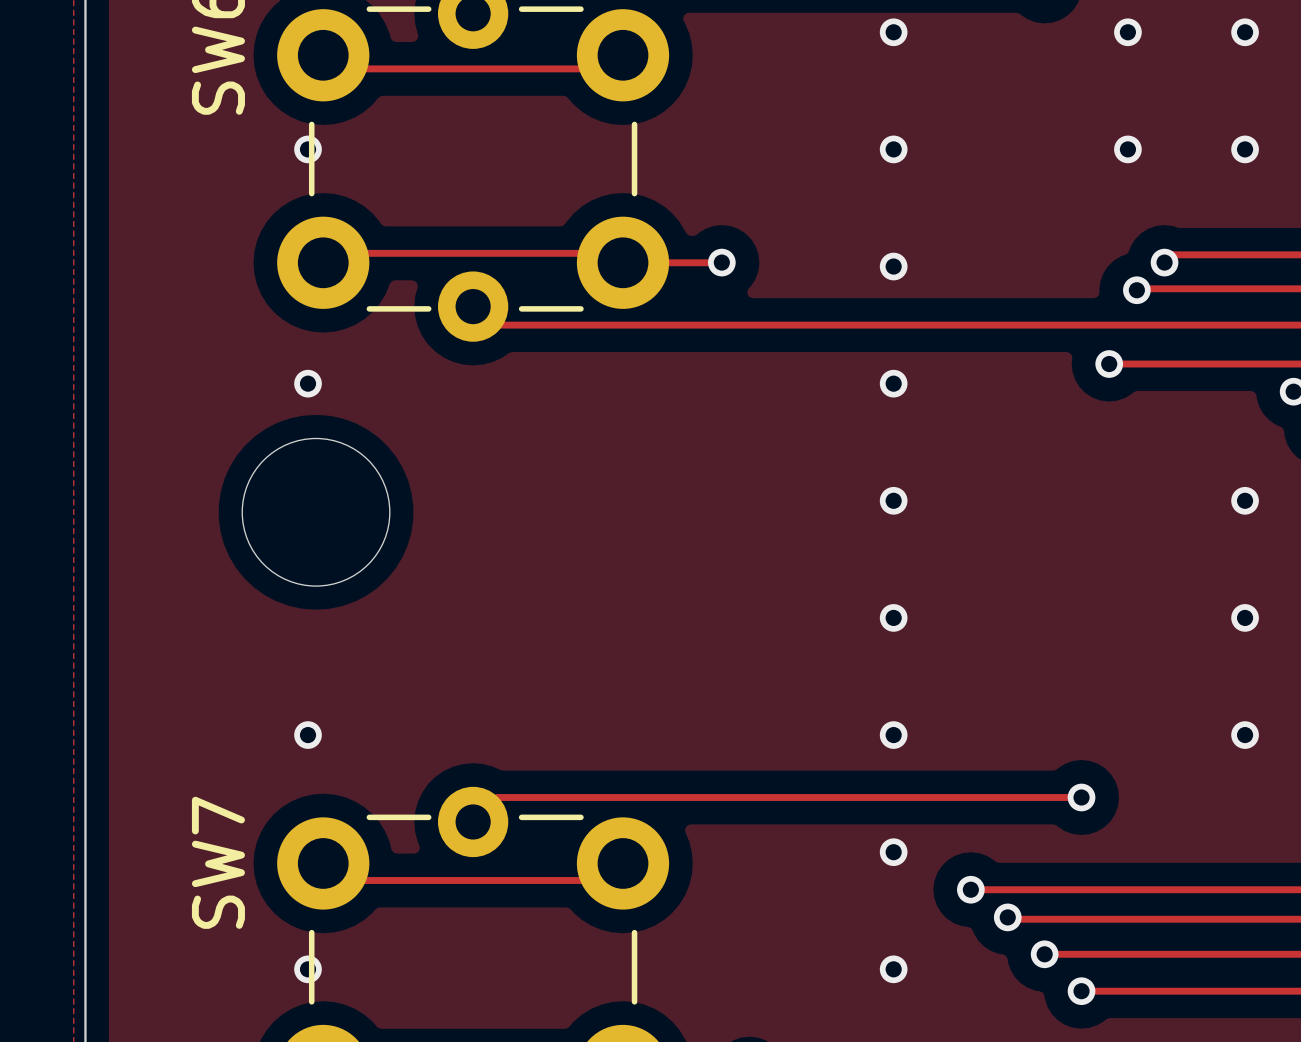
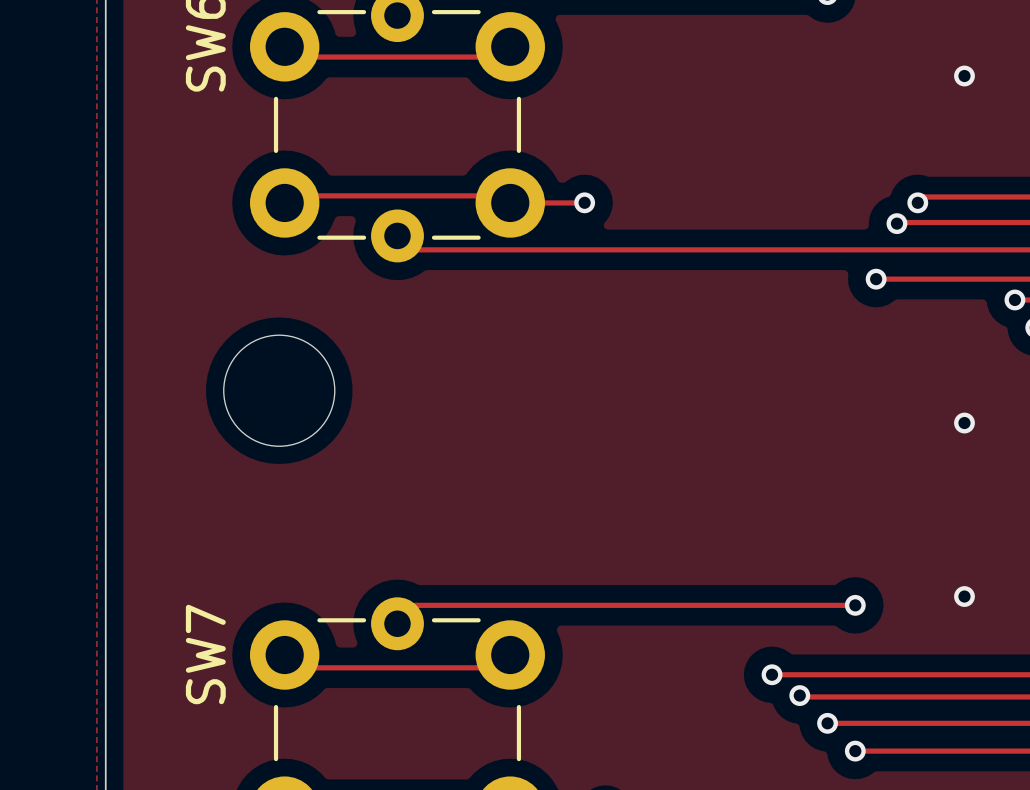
via: (893, 32) -> none
via: (1127, 32) -> none
via: (1245, 32) -> none
via: none -> (964, 76)
via: (308, 149) -> none
via: (893, 149) -> none
via: (1127, 149) -> none
via: (1245, 149) -> none
via: (893, 266) -> none
via: (308, 383) -> none
via: (893, 383) -> none
via: (893, 500) -> none
via: (1245, 500) -> none
via: none -> (964, 423)
via: (893, 617) -> none
via: (1245, 617) -> none
via: (308, 735) -> none
via: (893, 735) -> none
via position: (1245, 735) -> (964, 596)
via: (893, 852) -> none
via: (308, 969) -> none
via: (893, 969) -> none

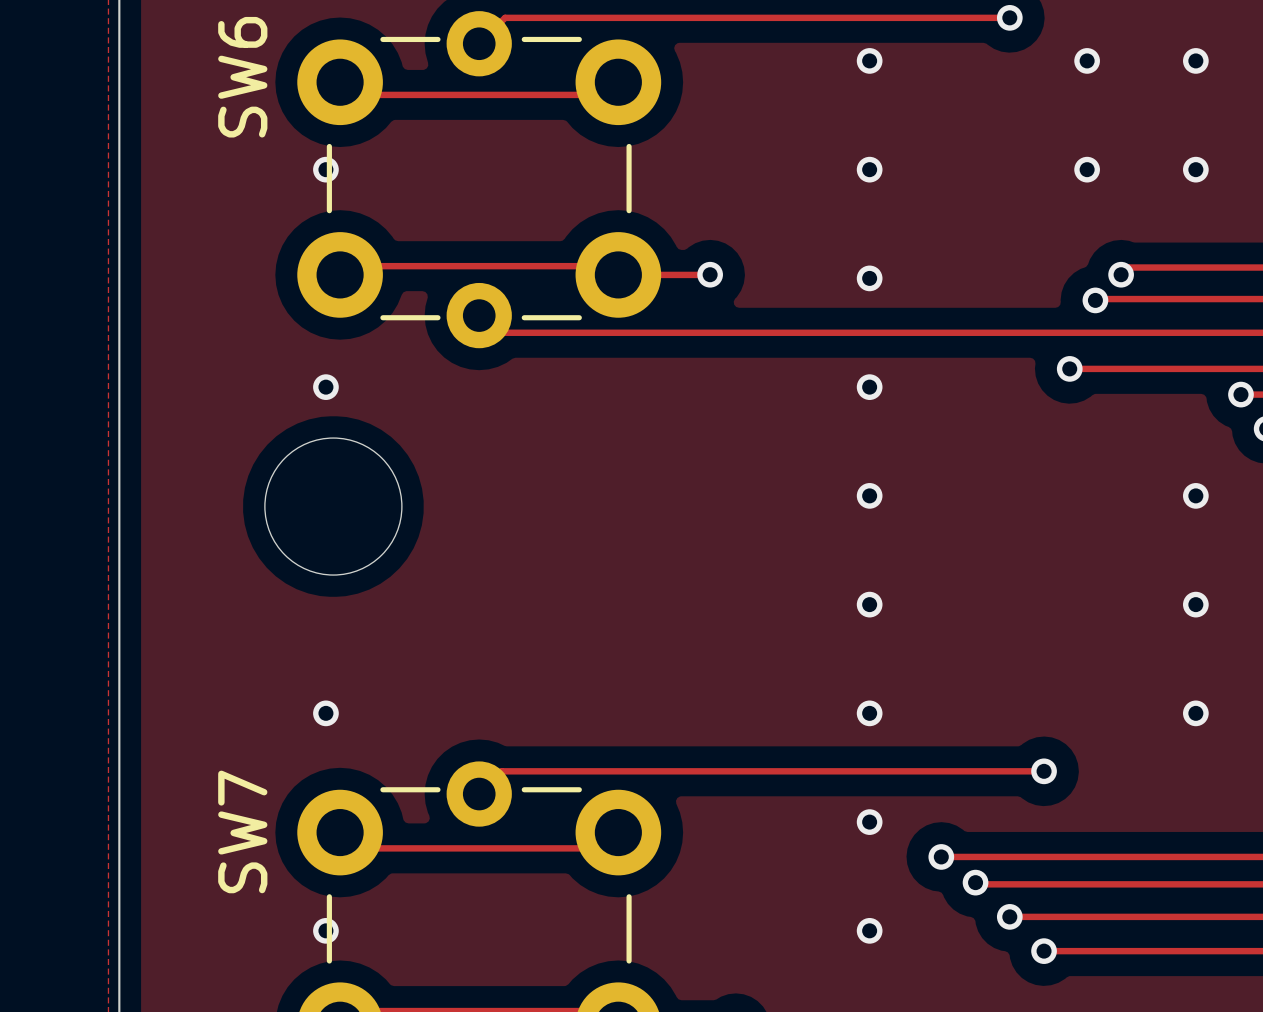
via: none -> (869, 60)
via: none -> (1087, 60)
via: none -> (1195, 60)
via: (964, 76) -> none
via: none -> (325, 169)
via: none -> (869, 169)
via: none -> (1087, 169)
via: none -> (1195, 169)
via: none -> (869, 278)
via: none -> (325, 387)
via: none -> (869, 387)
via: none -> (869, 495)
via: none -> (1195, 495)
via: (964, 423) -> none
via: none -> (869, 604)
via: none -> (1195, 604)
via: none -> (325, 713)
via: none -> (869, 713)
via position: (964, 596) -> (1195, 713)
via: none -> (869, 822)
via: none -> (325, 930)
via: none -> (869, 930)

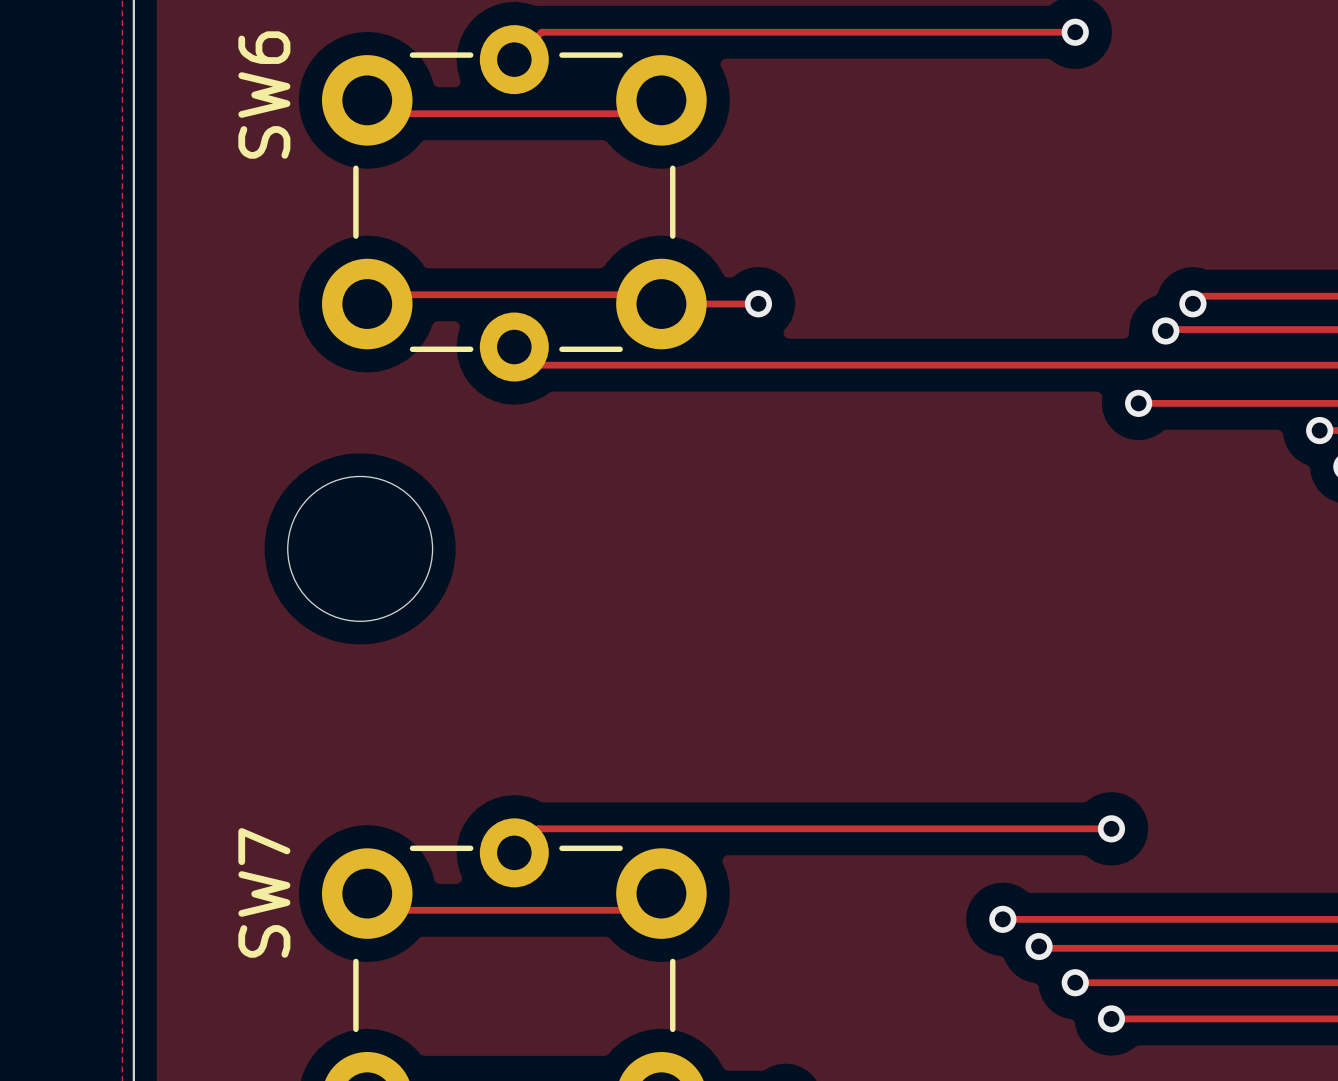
via: (869, 60) -> none
via: (1087, 60) -> none
via: (1195, 60) -> none
via: (325, 169) -> none
via: (869, 169) -> none
via: (1087, 169) -> none
via: (1195, 169) -> none
via: (869, 278) -> none
via: (325, 387) -> none
via: (869, 387) -> none
via: (869, 495) -> none
via: (1195, 495) -> none
via: (869, 604) -> none
via: (1195, 604) -> none
via: (325, 713) -> none
via: (869, 713) -> none
via: (1195, 713) -> none
via: (869, 822) -> none
via: (325, 930) -> none
via: (869, 930) -> none

